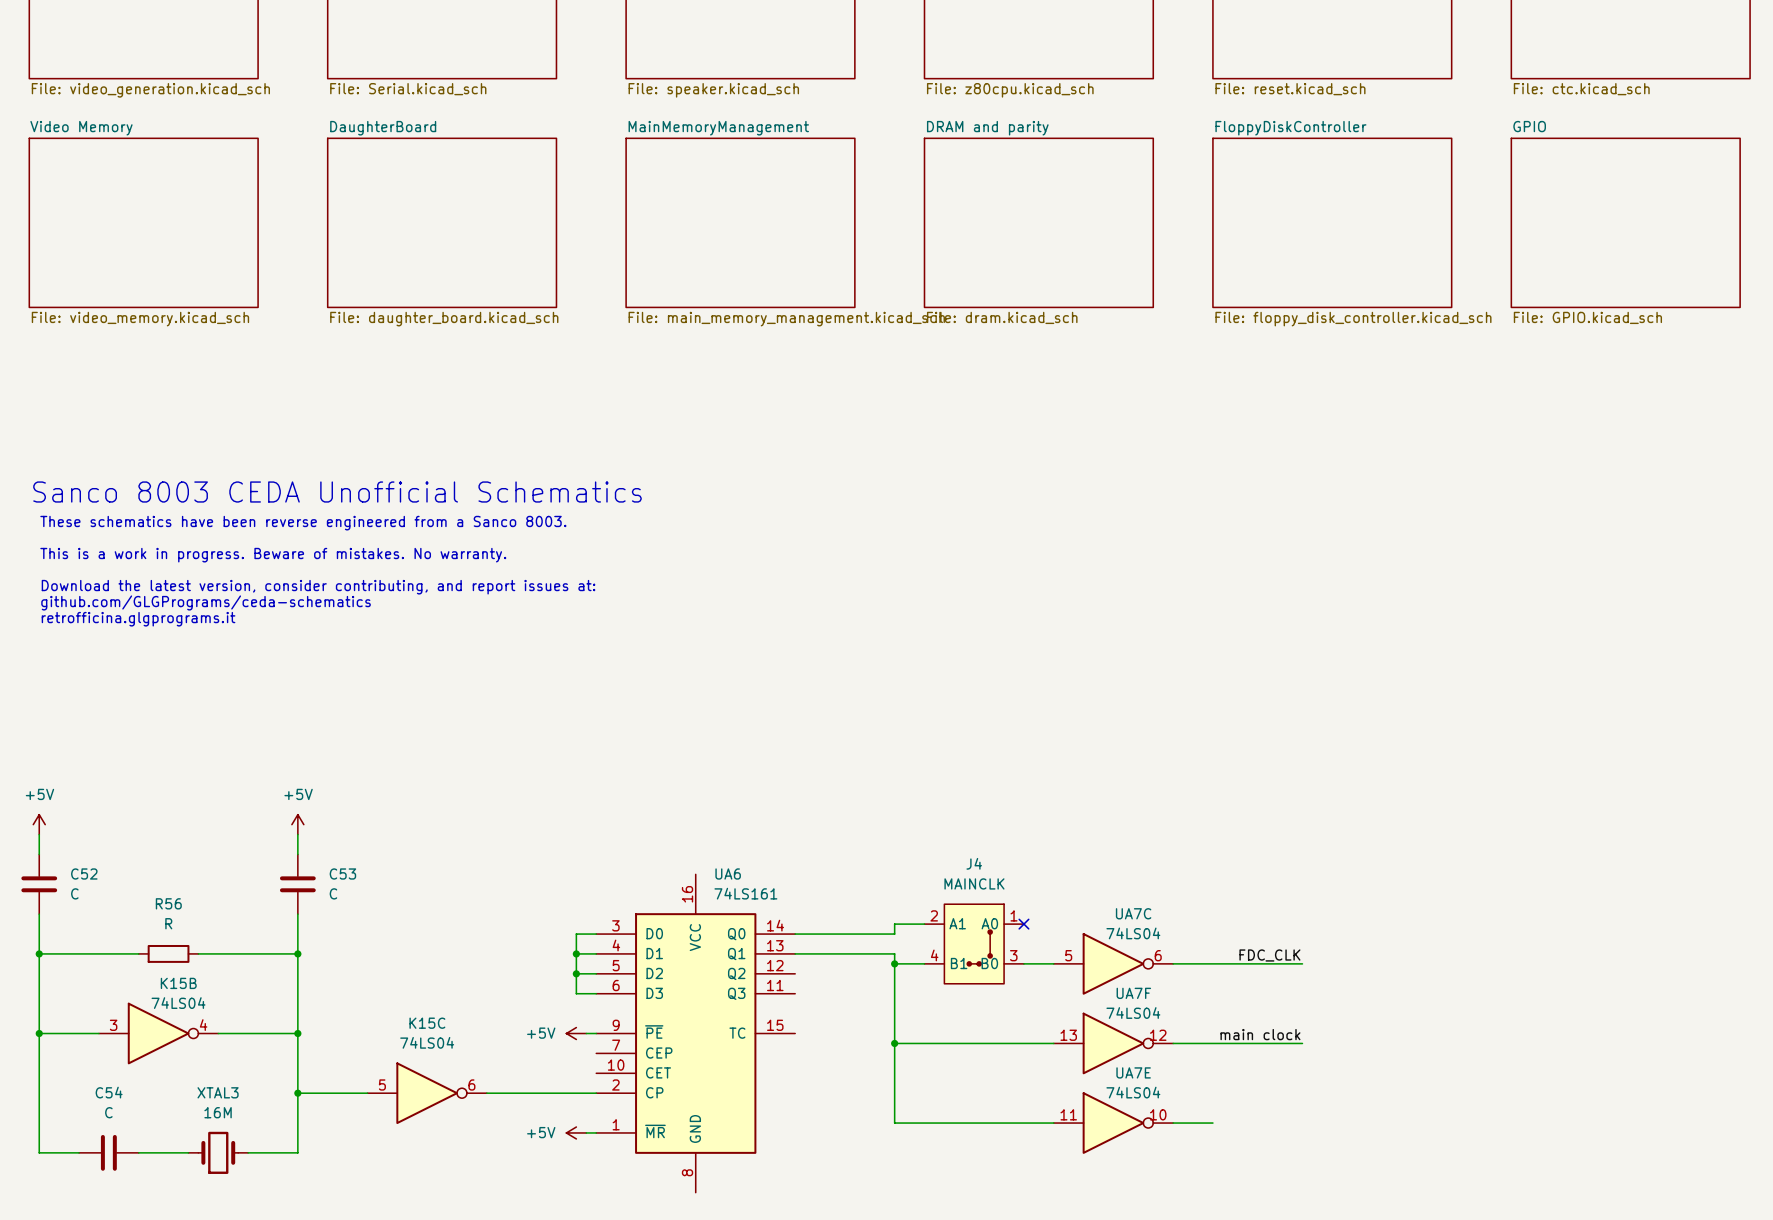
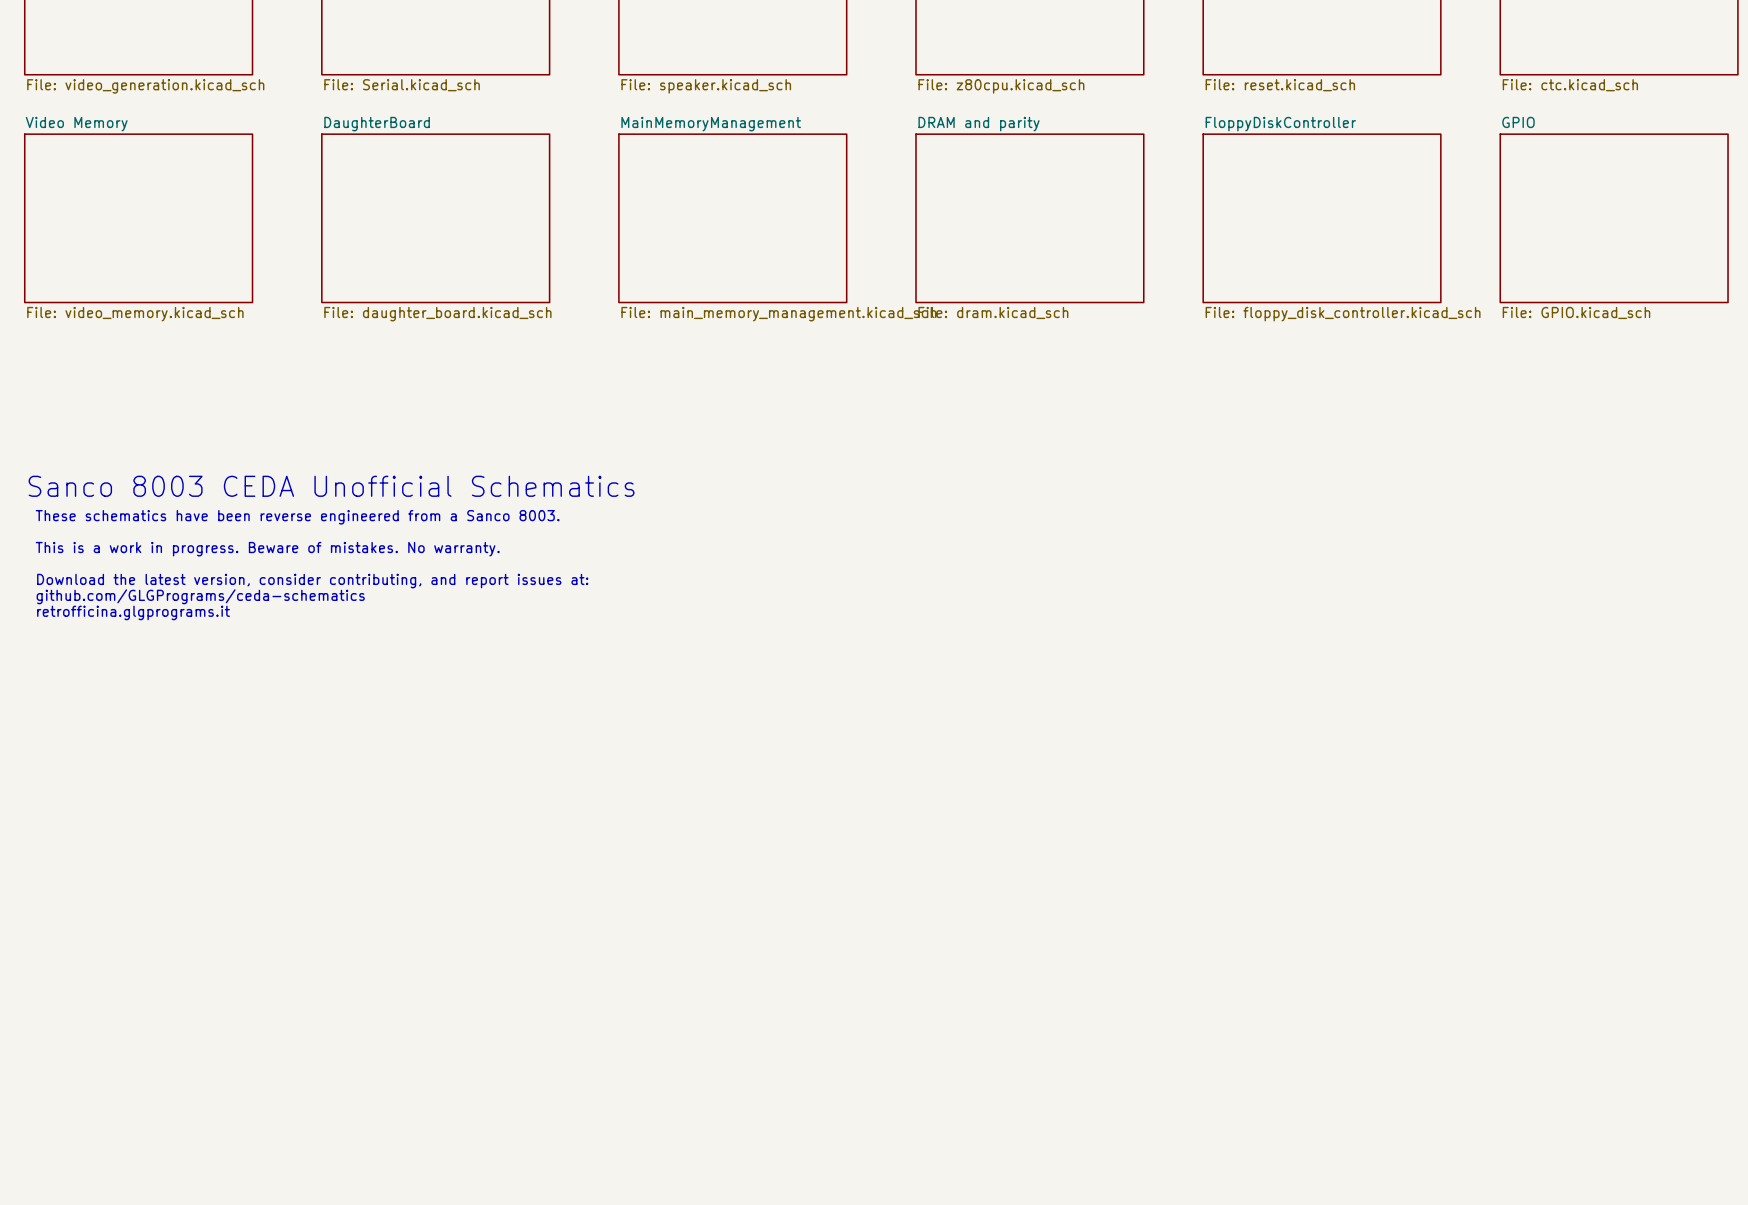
power symbol: +5V (39, 824) -> none
power symbol: +5V (297, 824) -> none
wire: (39, 834) (39, 854) -> none
wire: (297, 834) (297, 854) -> none
C52: C (39, 884) -> none
C53: C (297, 884) -> none
wire: (39, 914) (39, 1152) (79, 1152) -> none
wire: (297, 914) (297, 1152) (248, 1152) -> none
wire: (924, 924) (894, 924) (894, 934) (795, 934) -> none
no-connect mark: (1023, 924) -> none
wire: (596, 934) (576, 934) (576, 993) (596, 993) -> none
J4: MAINCLK (974, 943) -> none
wire: (39, 953) (138, 953) -> none
junction: (39, 953) -> none
R56: R (168, 953) -> none
wire: (198, 953) (297, 953) -> none
junction: (297, 953) -> none
wire: (576, 953) (596, 953) -> none
junction: (576, 953) -> none
wire: (795, 953) (894, 953) (894, 1123) (1053, 1123) -> none
label: FDC_CLK (1269, 955) -> none
wire: (894, 963) (924, 963) -> none
junction: (894, 963) -> none
wire: (1023, 963) (1053, 963) -> none
UA7C: 74LS04 (1113, 963) -> none
wire: (1173, 963) (1302, 963) -> none
wire: (576, 973) (596, 973) -> none
junction: (576, 973) -> none
wire: (39, 1033) (98, 1033) -> none
junction: (39, 1033) -> none
K15B: 74LS04 (158, 1033) -> none
wire: (218, 1033) (297, 1033) -> none
junction: (297, 1033) -> none
power symbol: +5V (576, 1033) -> none
wire: (586, 1033) (596, 1033) -> none
UA6: 74LS161 (695, 1033) -> none
label: main clock (1260, 1034) -> none
wire: (894, 1043) (1053, 1043) -> none
junction: (894, 1043) -> none
UA7F: 74LS04 (1113, 1043) -> none
wire: (1173, 1043) (1302, 1043) -> none
wire: (297, 1093) (367, 1093) -> none
junction: (297, 1093) -> none
K15C: 74LS04 (427, 1093) -> none
wire: (486, 1093) (596, 1093) -> none
UA7E: 74LS04 (1113, 1123) -> none
wire: (1173, 1123) (1212, 1123) -> none
power symbol: +5V (576, 1132) -> none
wire: (586, 1132) (596, 1132) -> none
C54: C (108, 1152) -> none
wire: (138, 1152) (188, 1152) -> none
XTAL3: 16M (218, 1152) -> none

